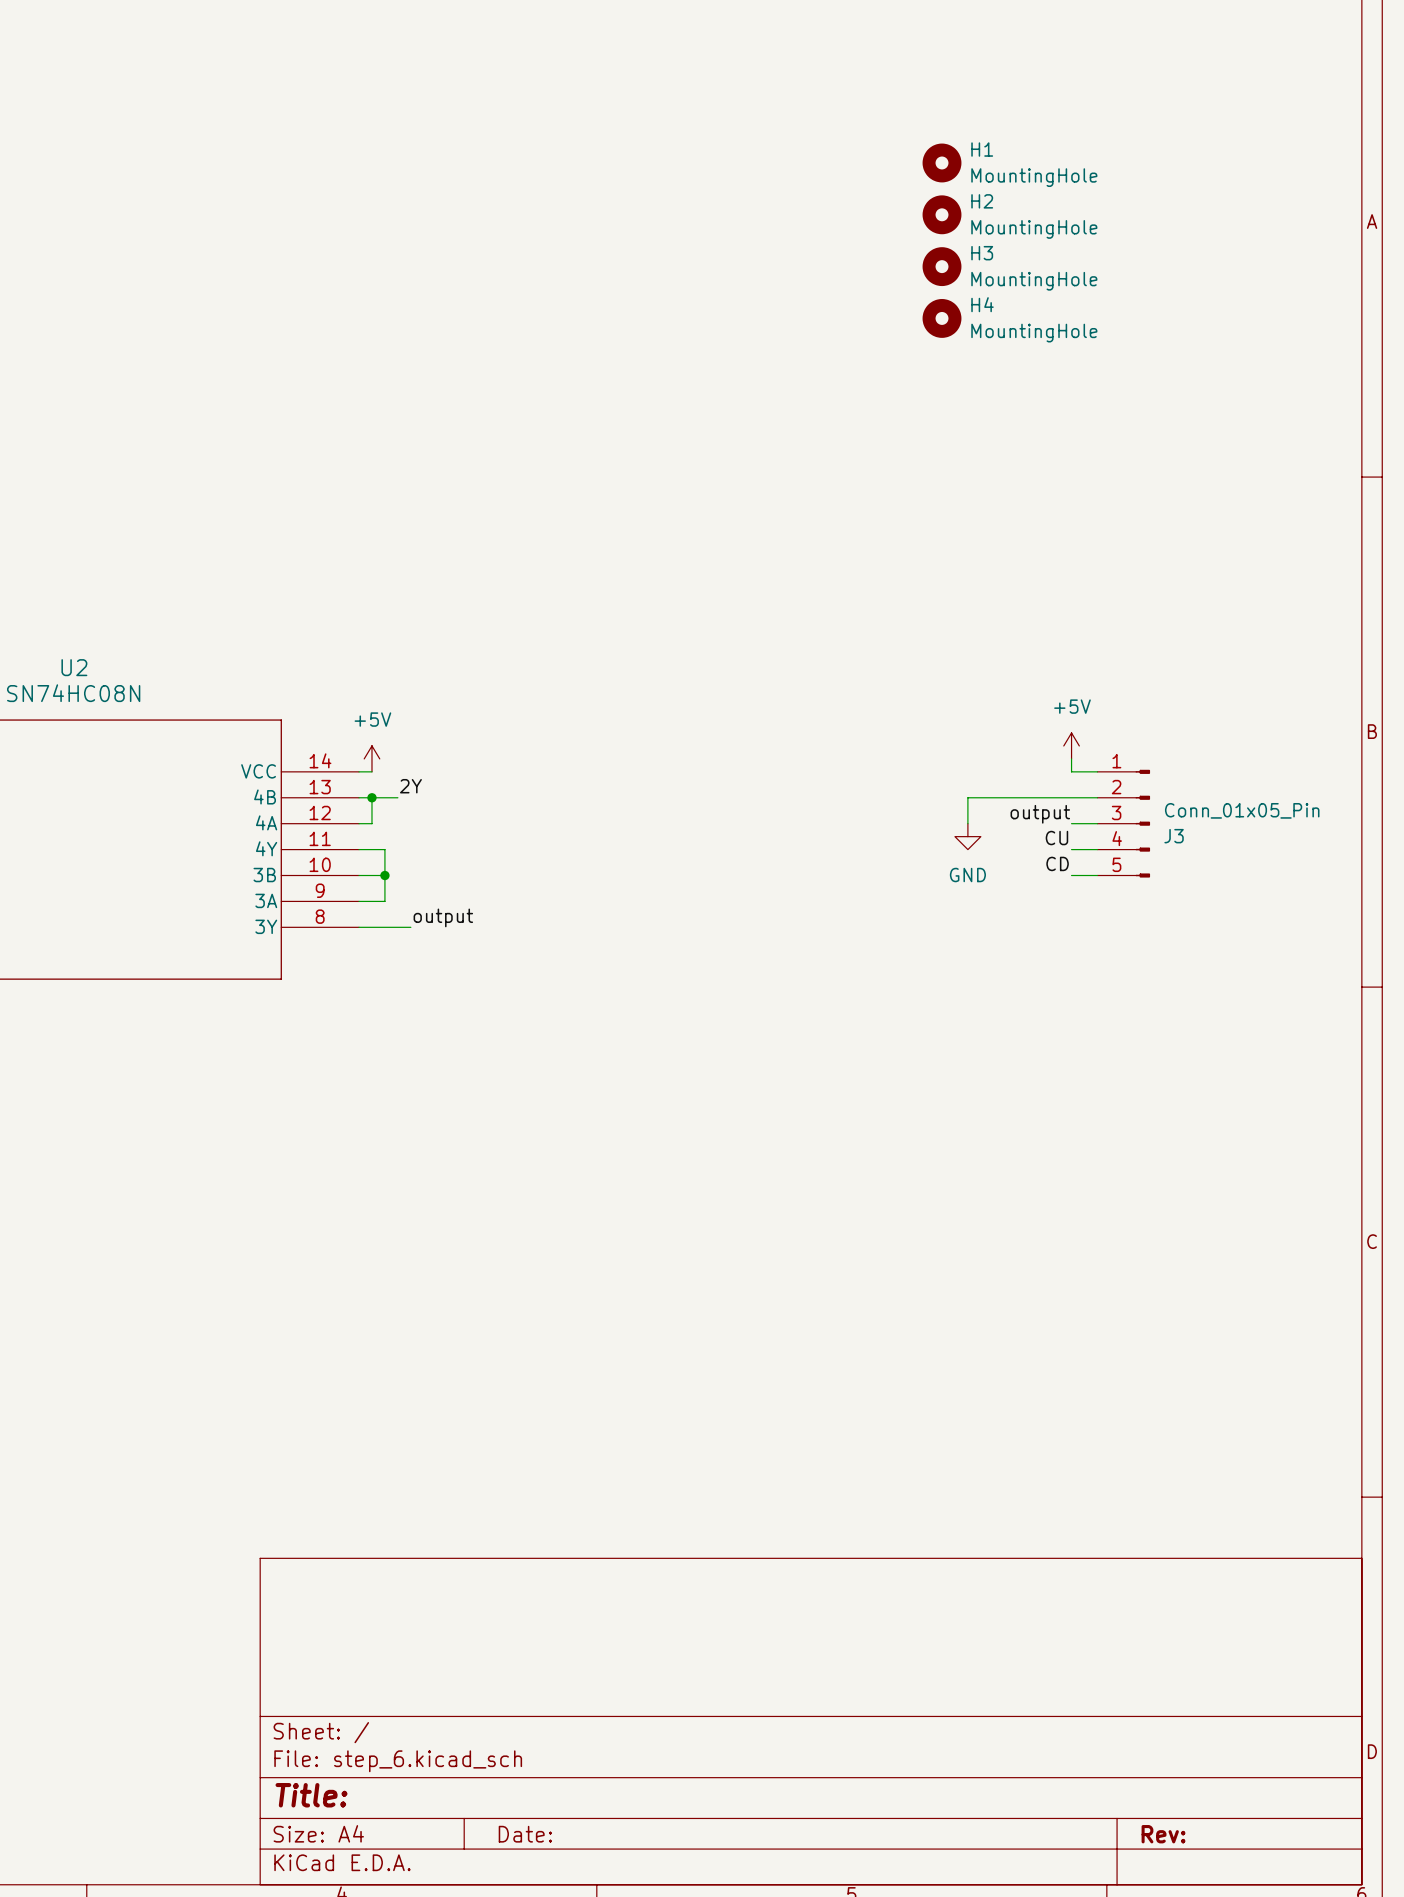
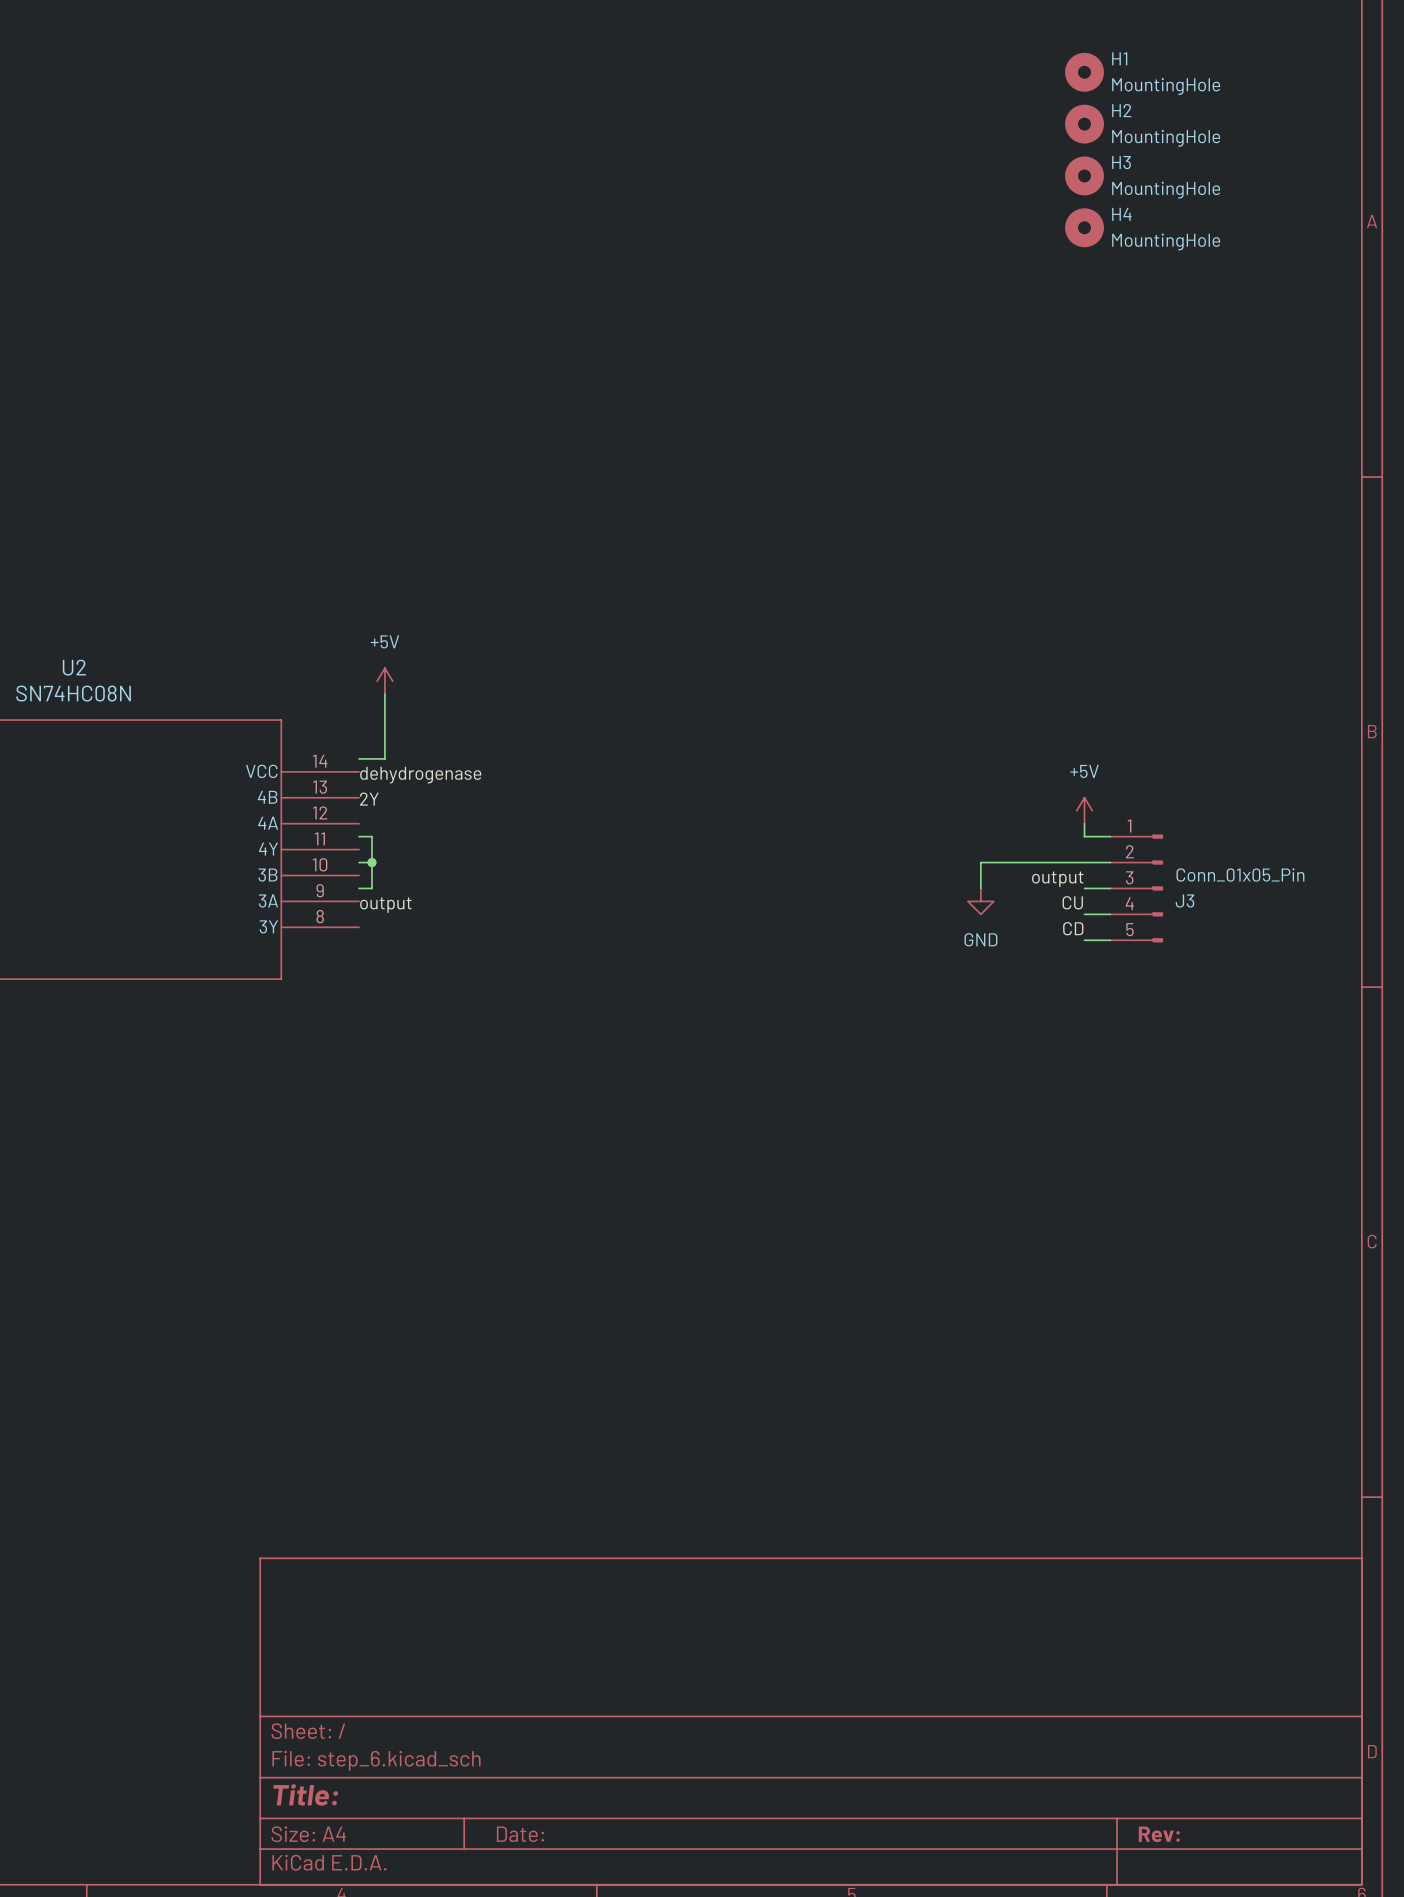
H1 position: (942, 162) -> (1084, 72)
H2 position: (942, 214) -> (1084, 124)
H3 position: (942, 266) -> (1084, 175)
H4 position: (942, 318) -> (1084, 227)
wire: none -> (384, 694) (384, 758) (359, 758)
power symbol position: +5V (1071, 745) -> +5V (1084, 810)
power symbol position: +5V (371, 758) -> +5V (384, 681)
wire: (1071, 758) (1071, 771) (1097, 771) -> (1084, 823) (1084, 836) (1110, 836)
wire: (359, 771) (371, 771) -> (359, 862) (371, 862)
label: none -> dehydrogenase (420, 775)
label position: 2Y (410, 786) -> 2Y (369, 799)
wire: (359, 797) (397, 797) -> none
wire: (371, 797) (371, 823) (359, 823) -> none
junction: (371, 797) -> none
wire: (1097, 797) (967, 797) (967, 823) -> (1110, 862) (980, 862) (980, 888)
label position: output (1040, 814) -> output (1057, 879)
wire: (1071, 823) (1097, 823) -> (1084, 888) (1110, 888)
J3 position: (1123, 823) -> (1136, 888)
wire: none -> (359, 836) (371, 836) (371, 888) (359, 888)
power symbol position: GND (967, 836) -> GND (980, 901)
label position: CU (1056, 838) -> CU (1072, 902)
wire: (359, 849) (384, 849) (384, 901) (359, 901) -> none
wire: (1071, 849) (1097, 849) -> (1084, 914) (1110, 914)
label position: CD (1057, 863) -> CD (1073, 928)
wire: (359, 875) (384, 875) -> none
junction position: (384, 875) -> (371, 862)
wire: (1071, 875) (1097, 875) -> (1084, 940) (1110, 940)
label position: output (443, 917) -> output (385, 905)
wire: (359, 927) (410, 927) -> none

